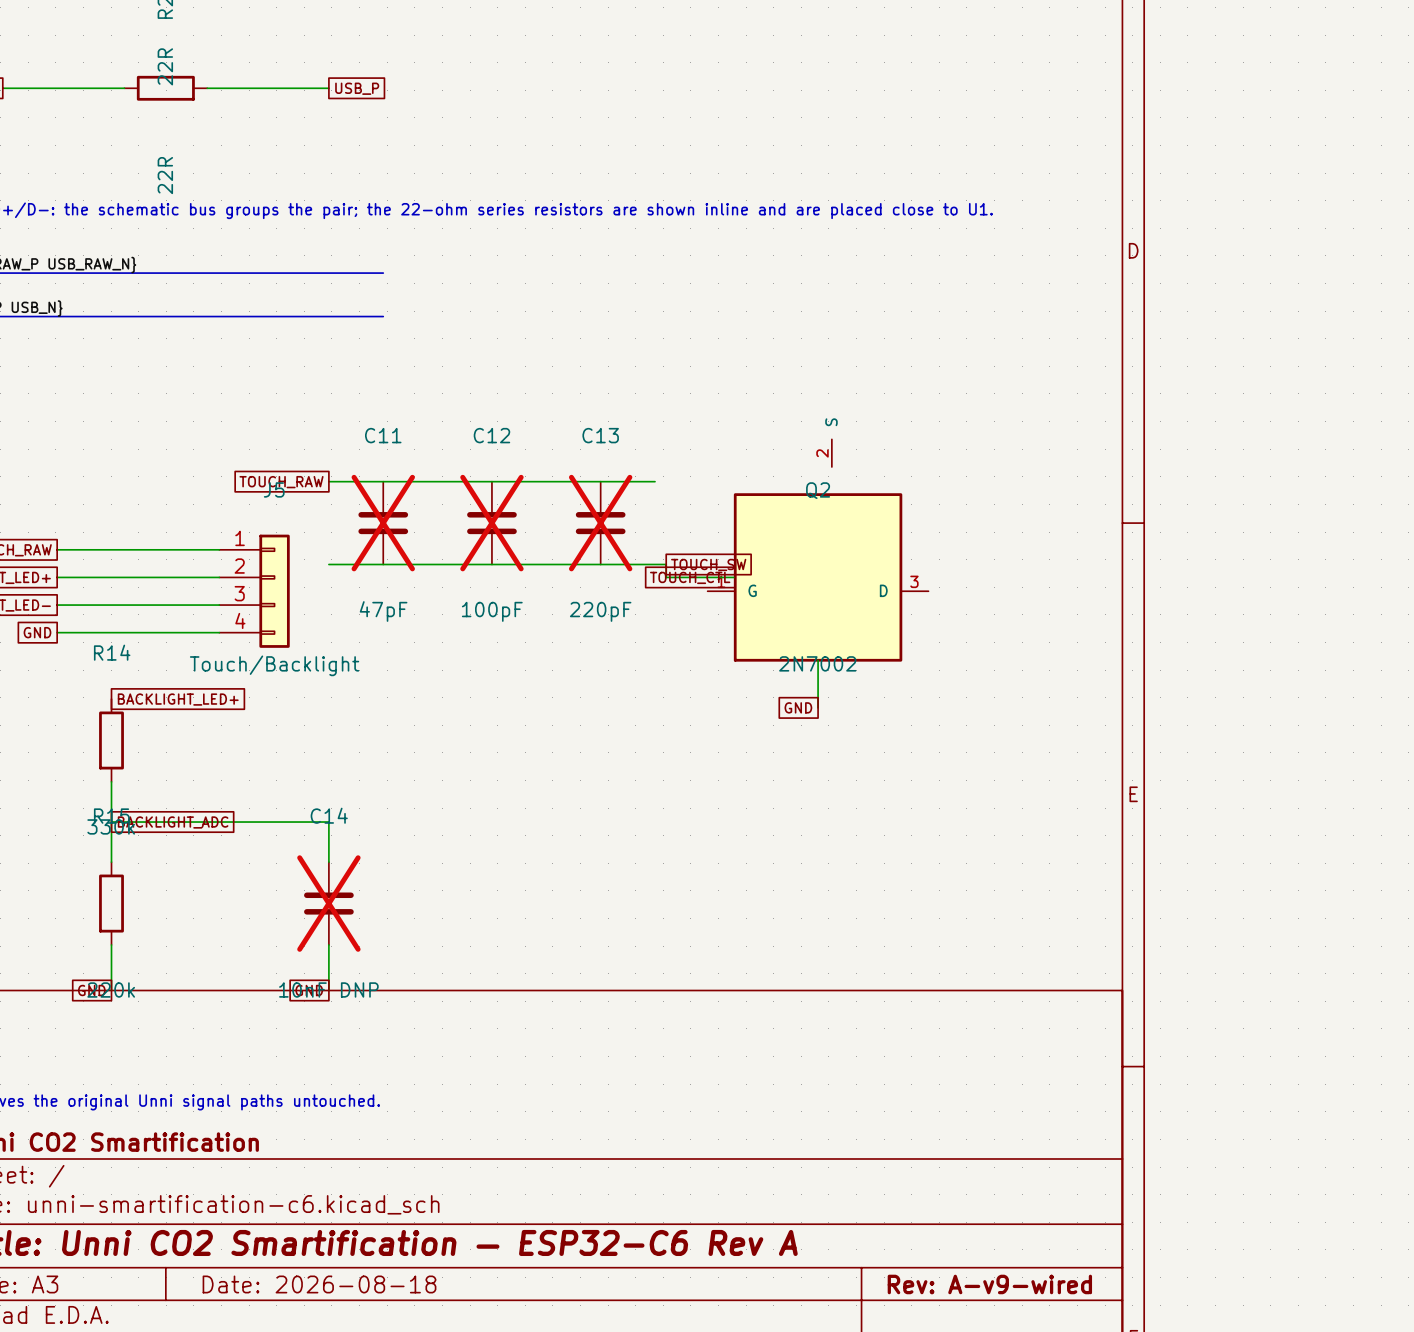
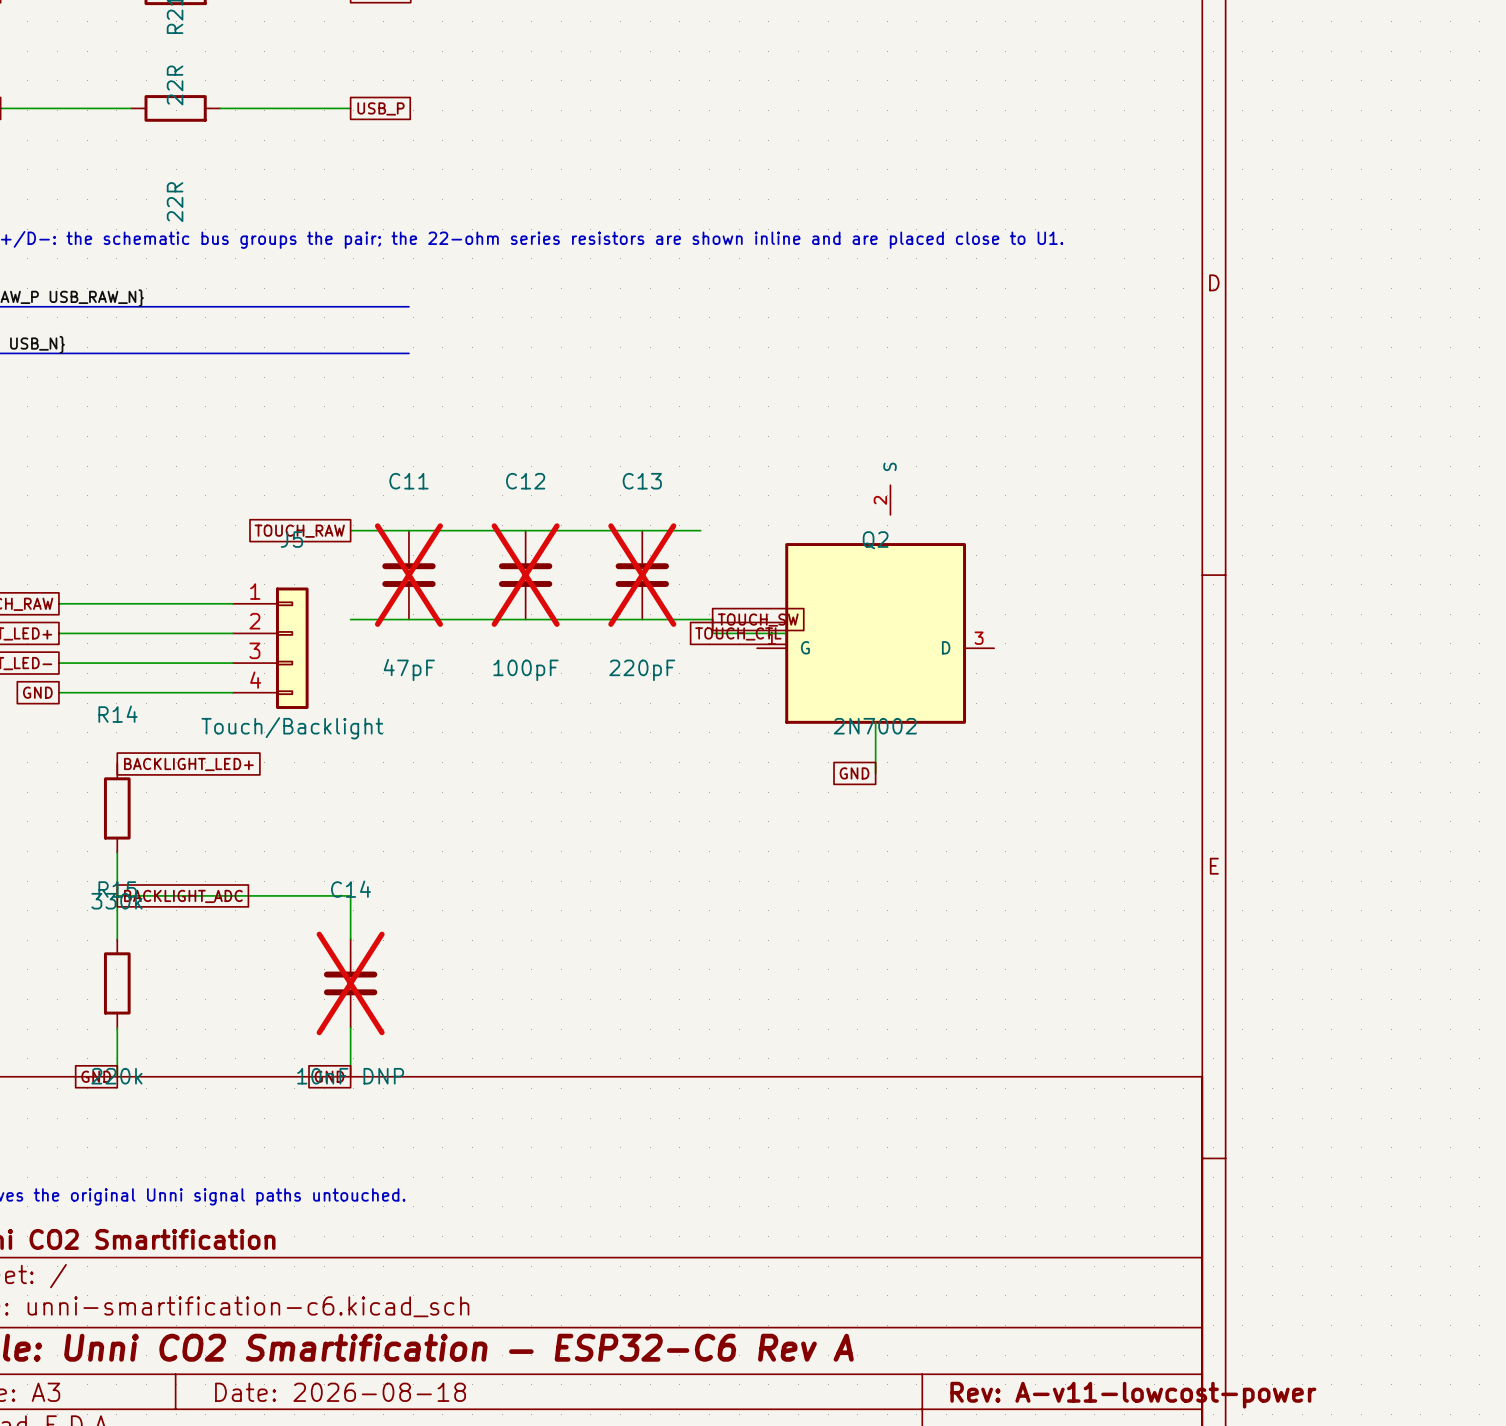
title block: Rev: A-v9-wired (989, 1284) -> Rev: A-v11-lowcost-power (1133, 1395)

